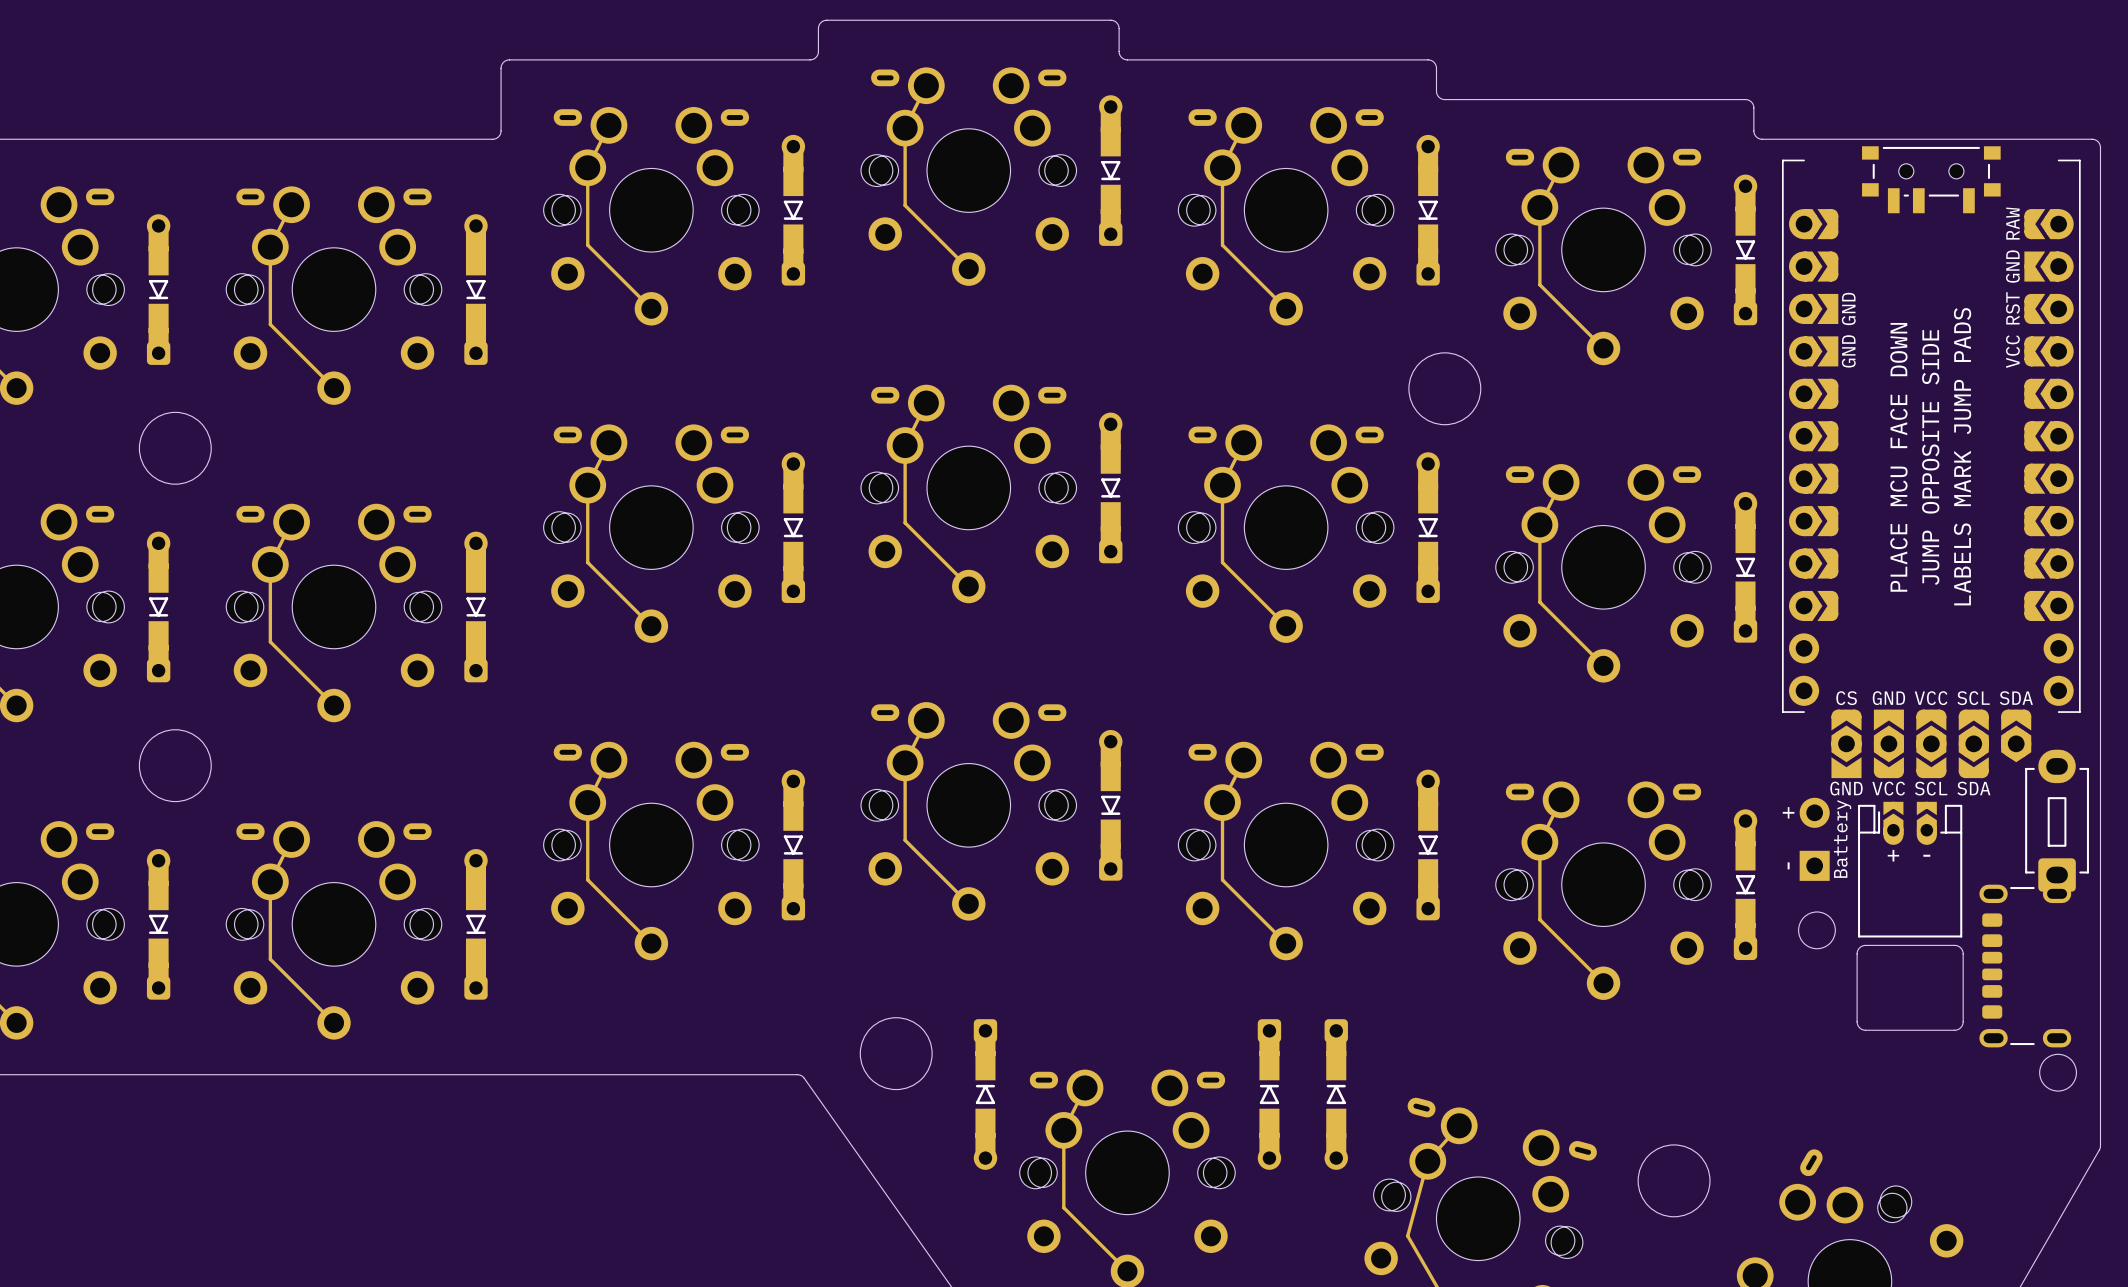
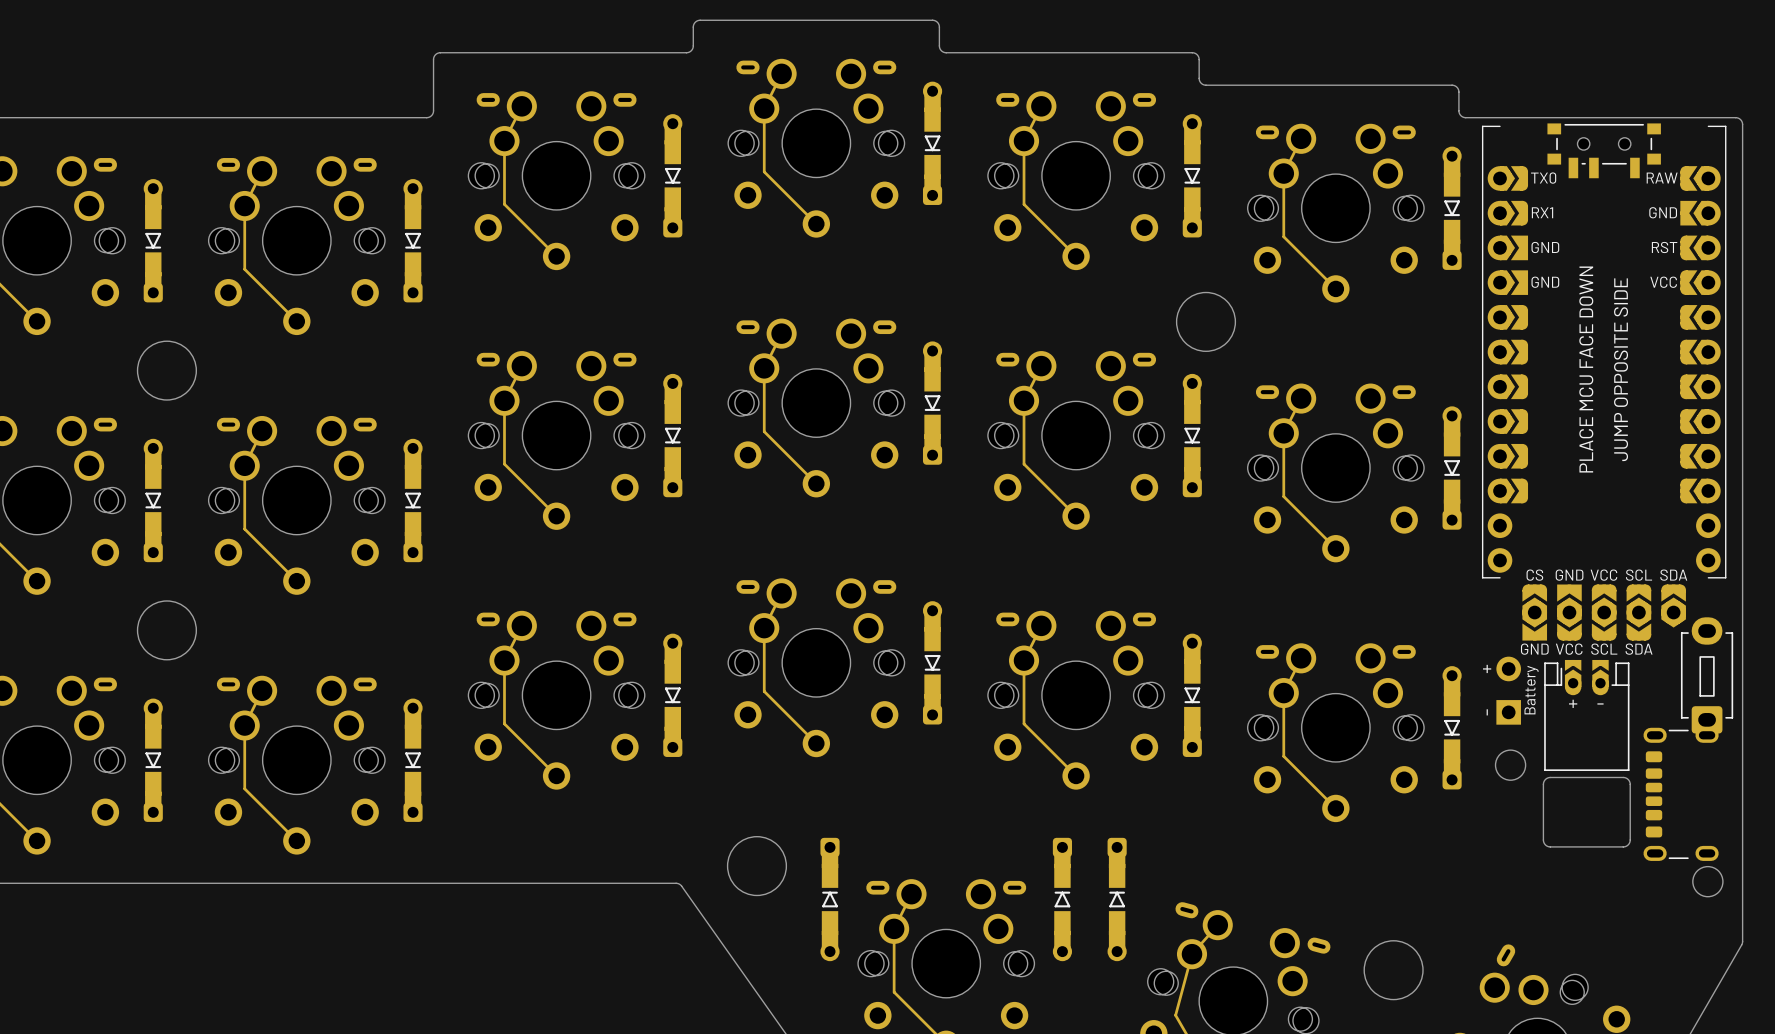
part footprint: [1782, 159, 2081, 713] -> [1481, 125, 1727, 579]

